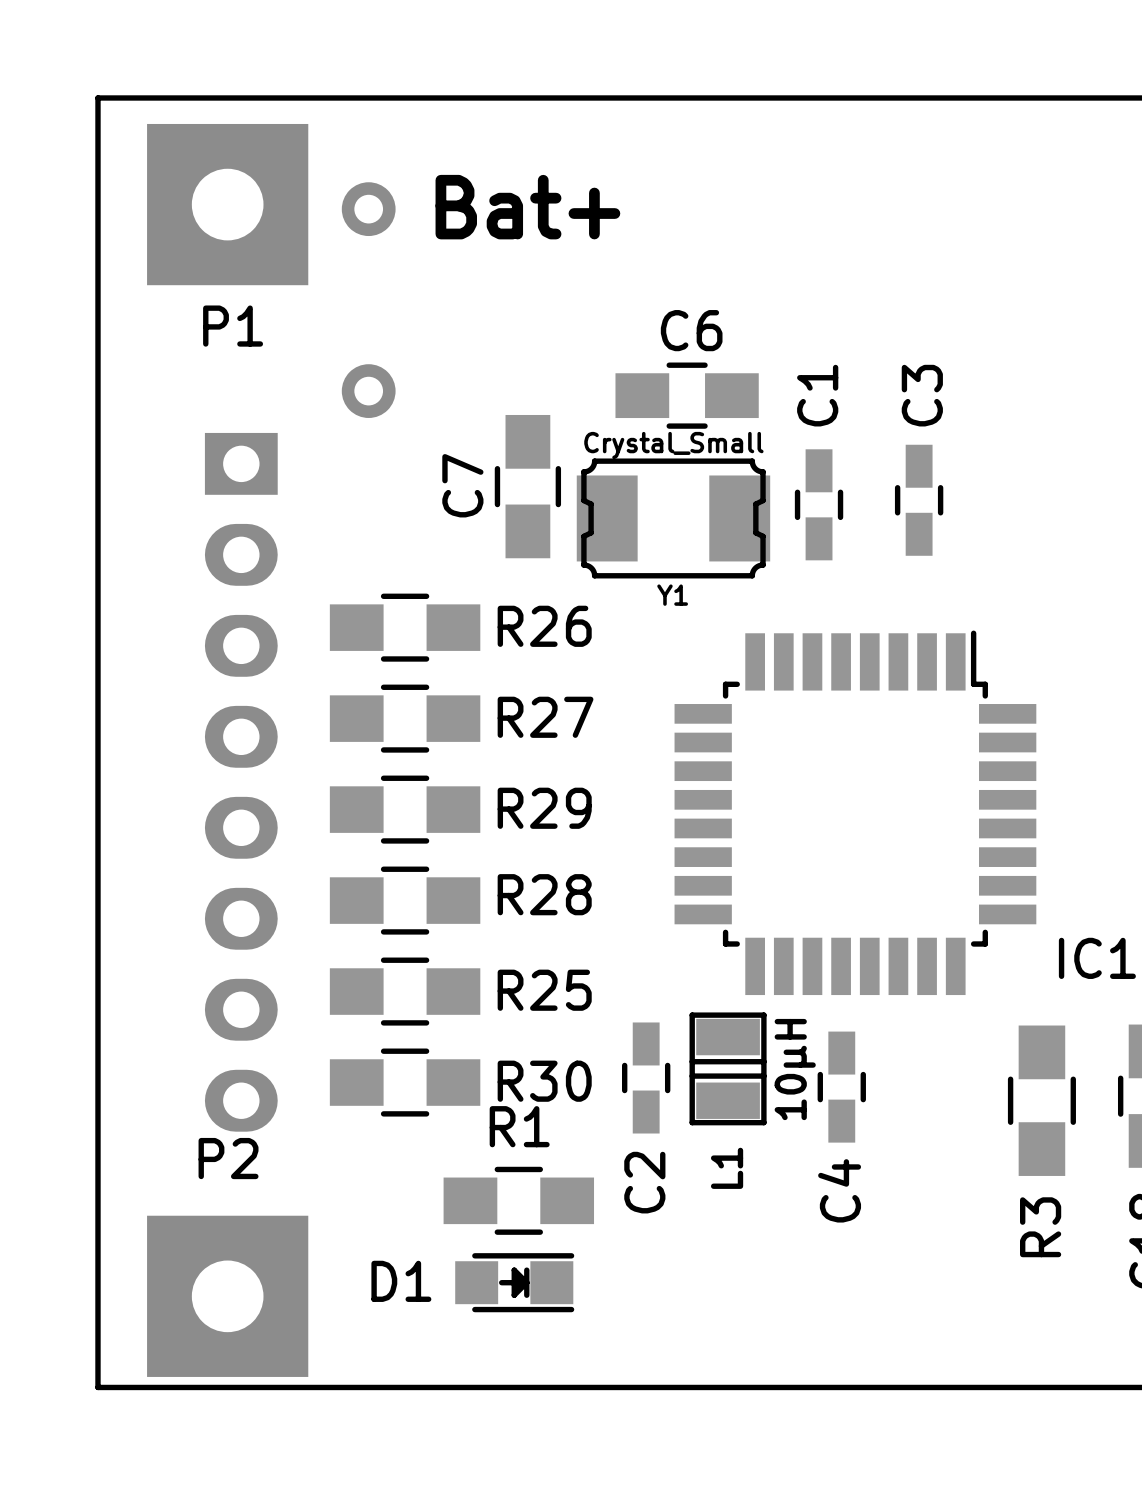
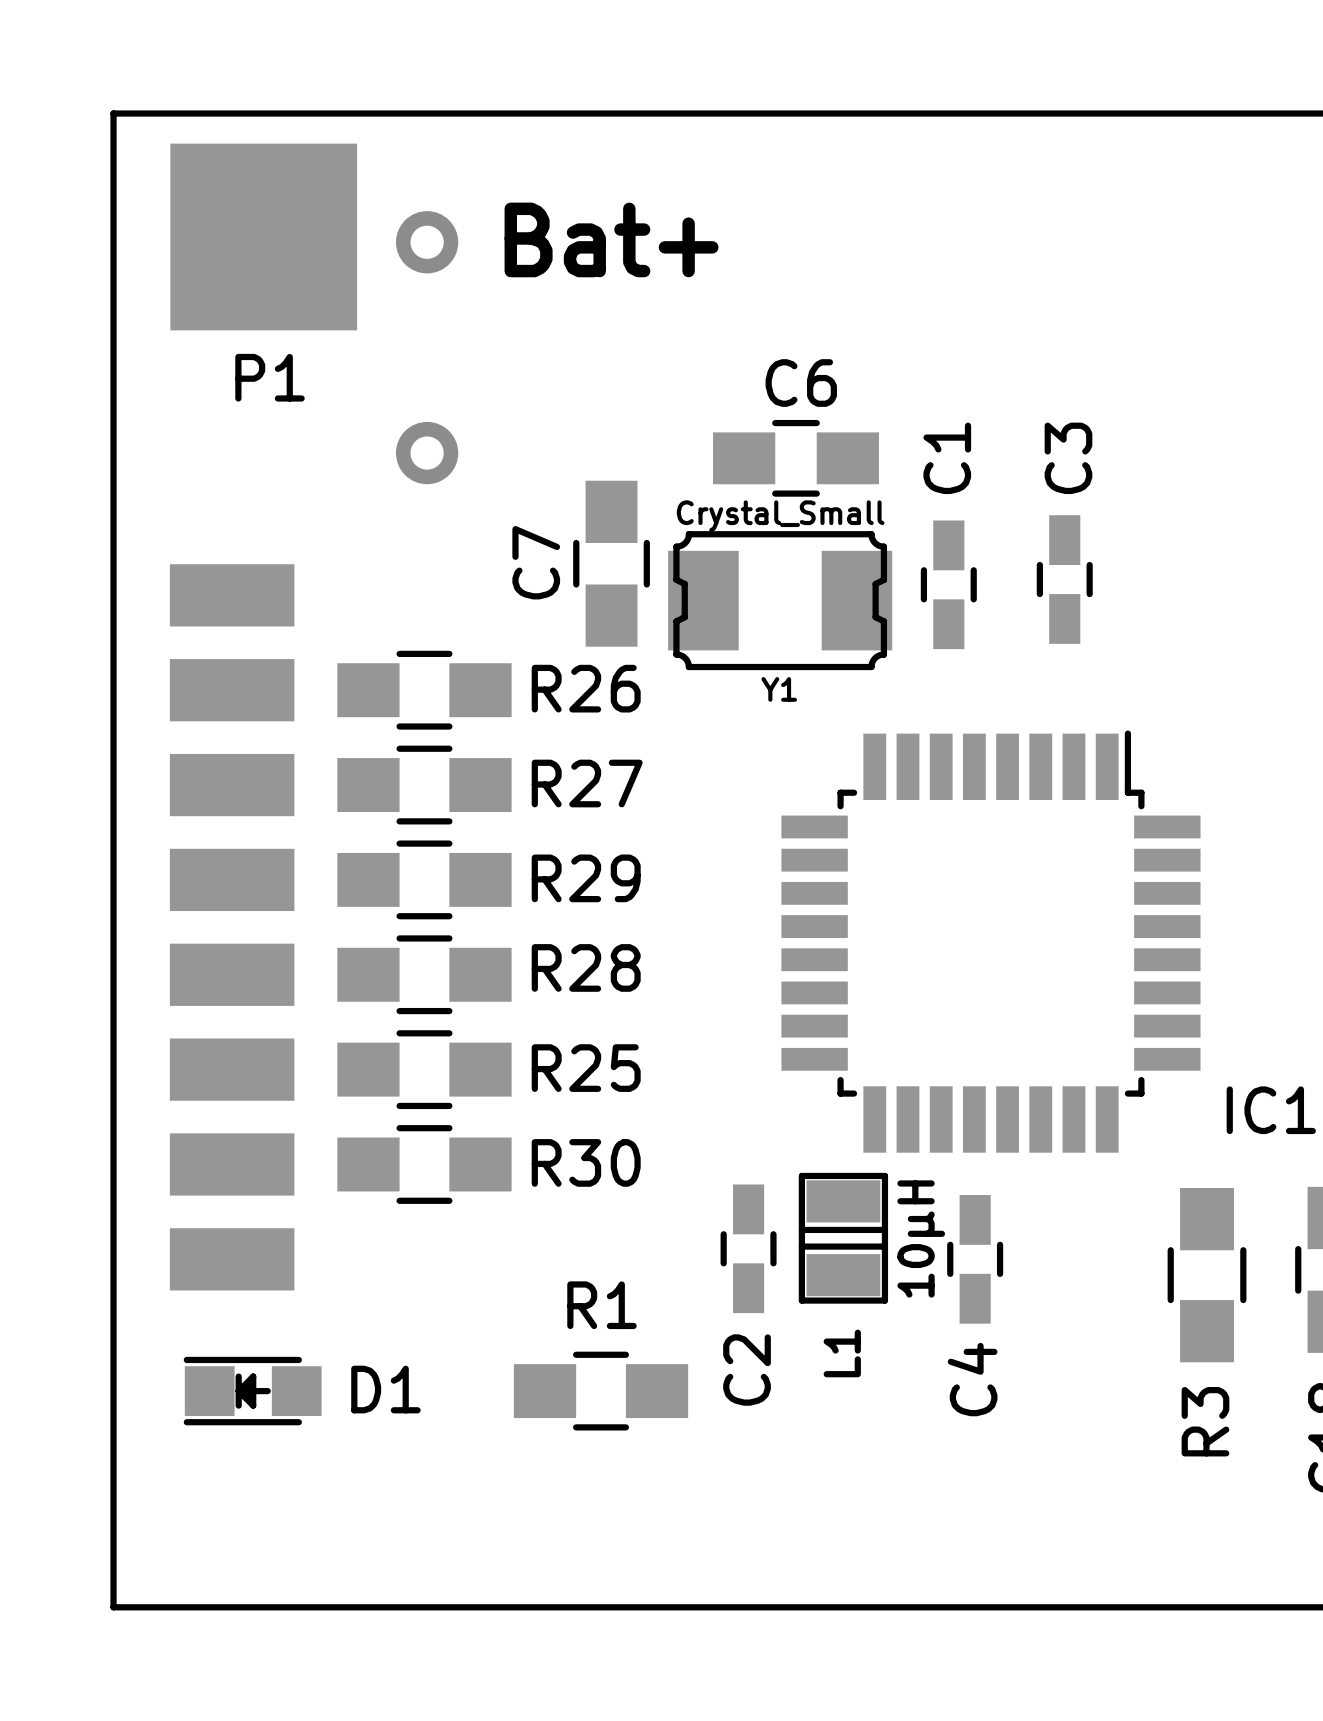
P1 footprint: [147, 123, 309, 286] -> [170, 143, 358, 331]
part: none -> (232, 595)
part: none -> (232, 690)
R26 position: (405, 627) -> (424, 690)
part: none -> (232, 785)
R27 position: (405, 718) -> (424, 785)
part: none -> (232, 879)
part: (241, 782) -> none
R29 position: (405, 809) -> (424, 879)
part: none -> (232, 974)
R28 position: (405, 900) -> (424, 974)
part: none -> (232, 1069)
R25 position: (405, 991) -> (424, 1069)
part: none -> (232, 1164)
R30 position: (405, 1082) -> (424, 1164)
part: none -> (232, 1259)
D1 rotation: 0° (514, 1282) -> 180° (252, 1391)
D1 position: (514, 1282) -> (252, 1391)
P2: (227, 1296) -> none

